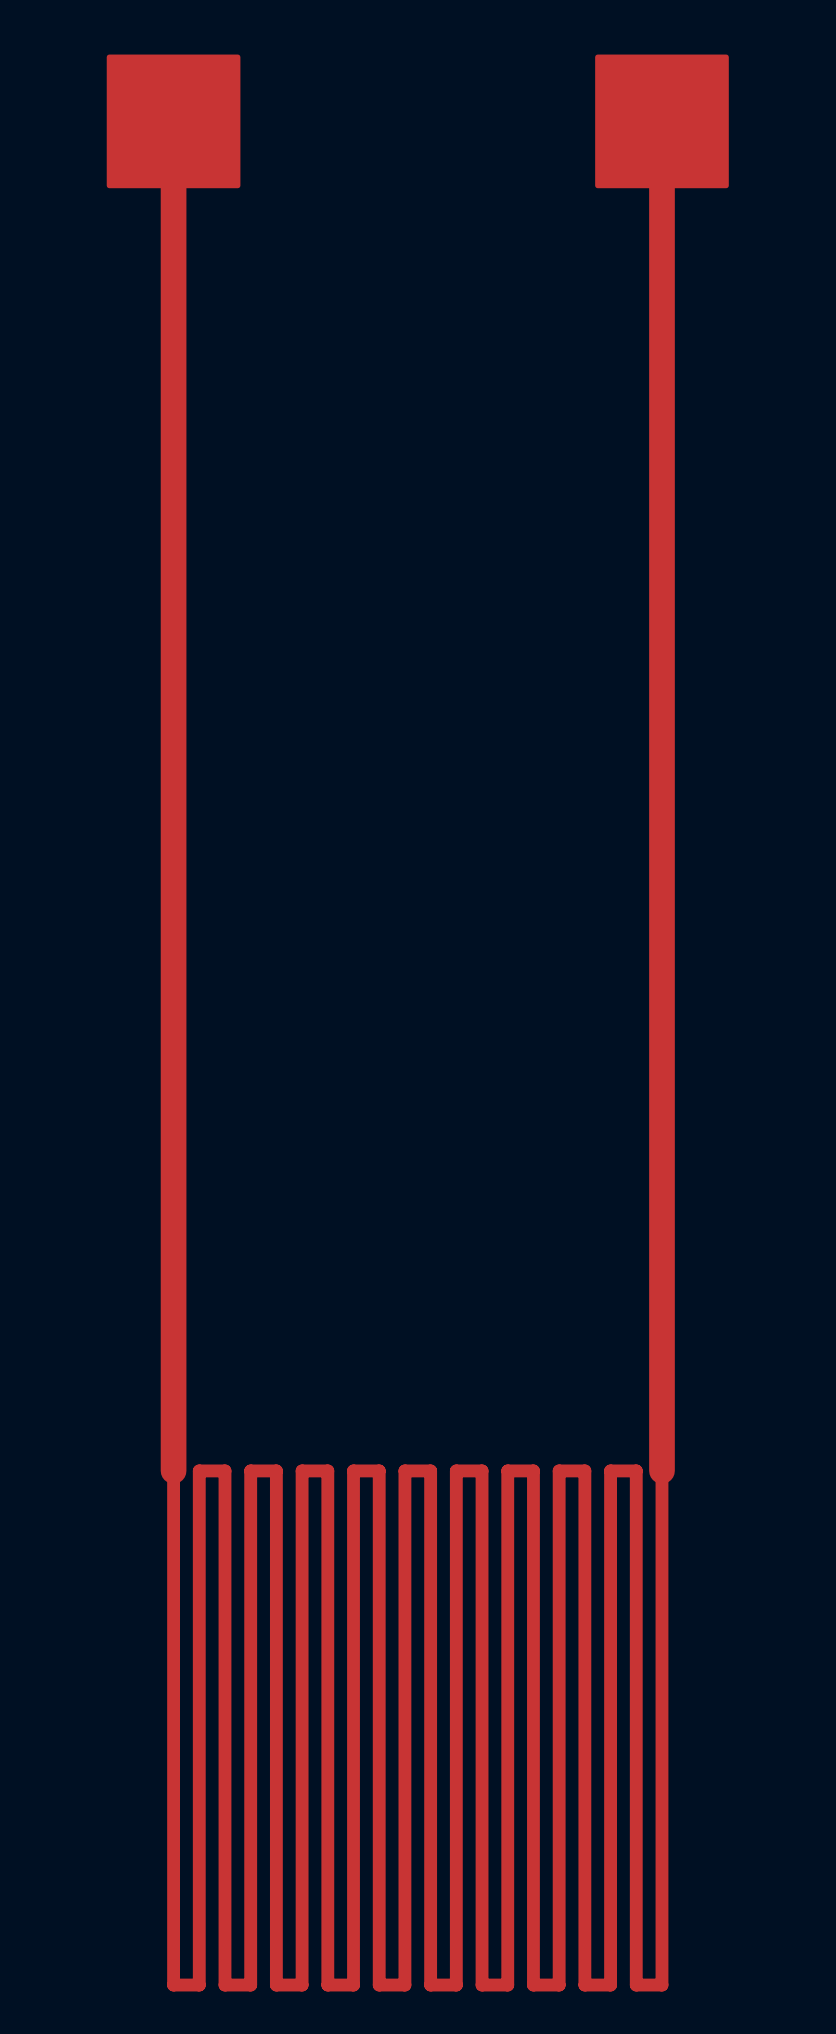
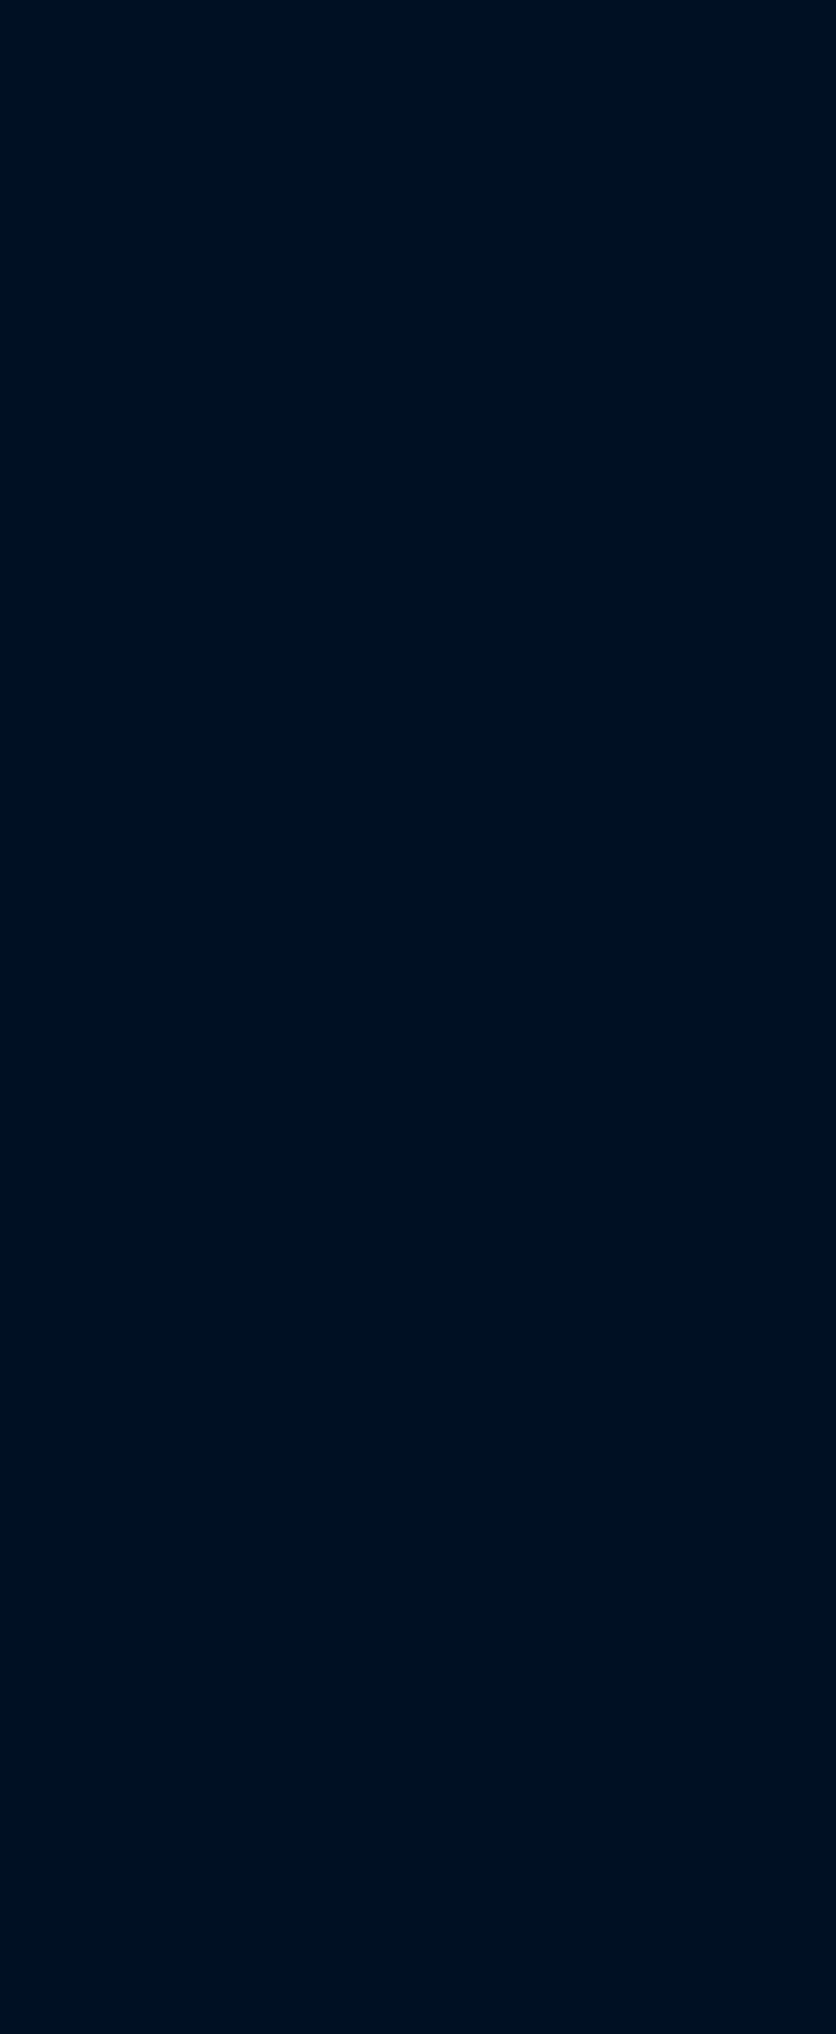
drawing: [106, 54, 241, 189] -> none
drawing: [595, 54, 729, 189] -> none
top track: (661, 121) (661, 1985) (636, 1985) (636, 1470) (610, 1470) (610, 1985) (584, 1985) (584, 1470) (559, 1470) (559, 1985) (533, 1985) (533, 1470) (507, 1470) (507, 1985) (482, 1985) (482, 1470) (456, 1470) (456, 1985) (430, 1985) (430, 1470) (404, 1470) (404, 1985) (379, 1985) (379, 1470) (353, 1470) (353, 1985) (327, 1985) (327, 1470) (302, 1470) (302, 1985) (276, 1985) (276, 1470) (250, 1470) (250, 1985) (224, 1985) (224, 1470) (199, 1470) (199, 1985) (173, 1985) (173, 121) -> none

